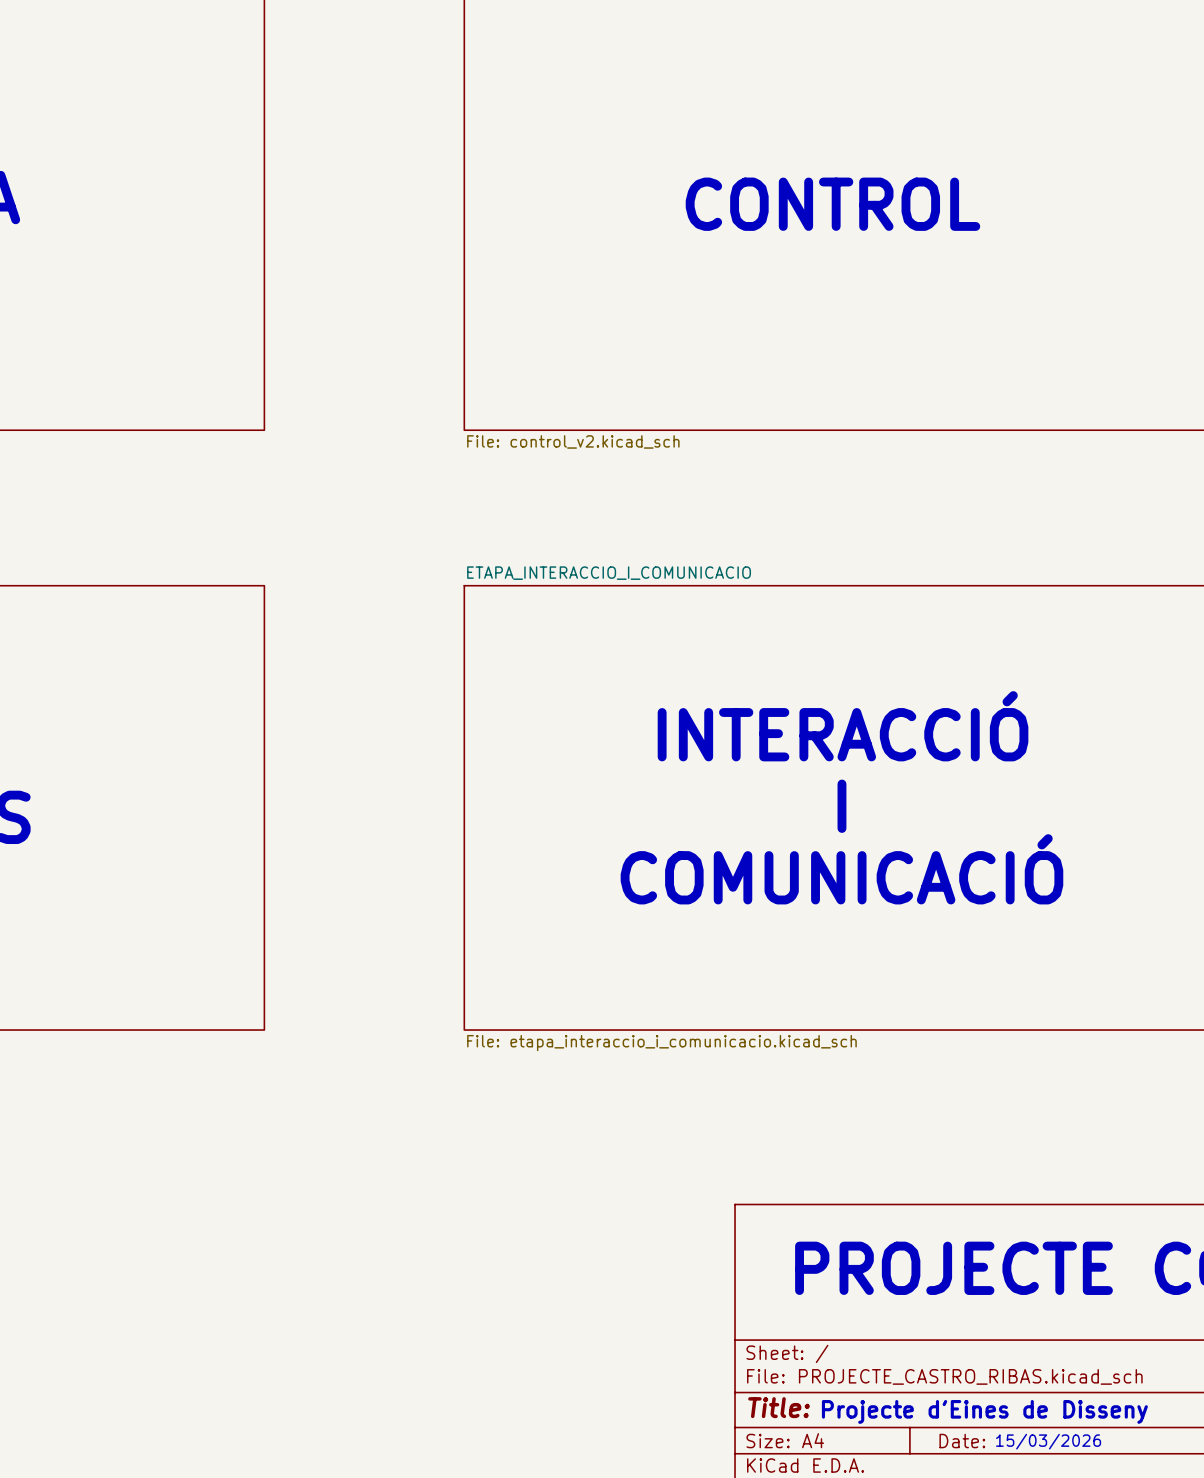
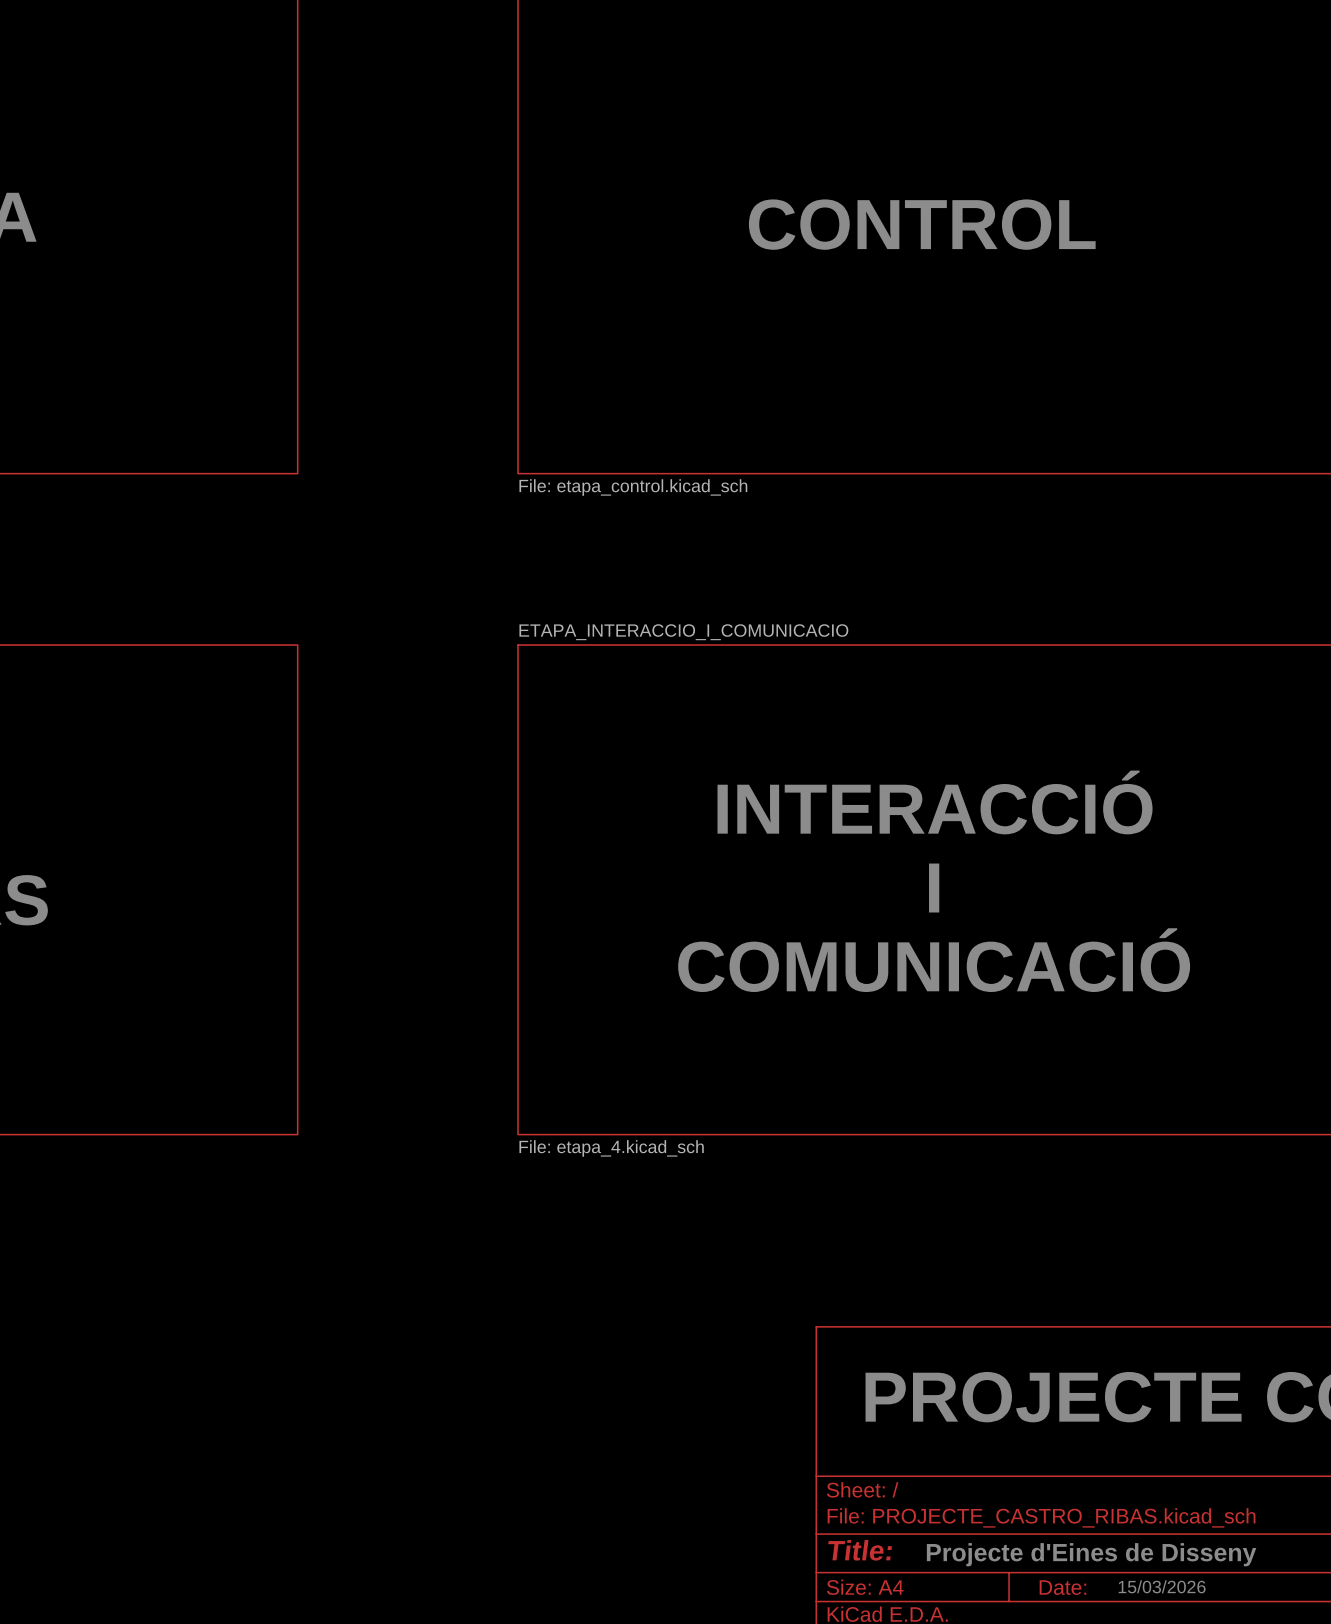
sheet value: File: control_v2.kicad_sch (573, 441) -> File: etapa_control.kicad_sch (633, 487)
sheet ETAPA_INTERACCIO_I_COMUNICACIO value: File: etapa_interaccio_i_comunicacio.kicad_sch (661, 1043) -> File: etapa_4.kicad_sch (611, 1148)

